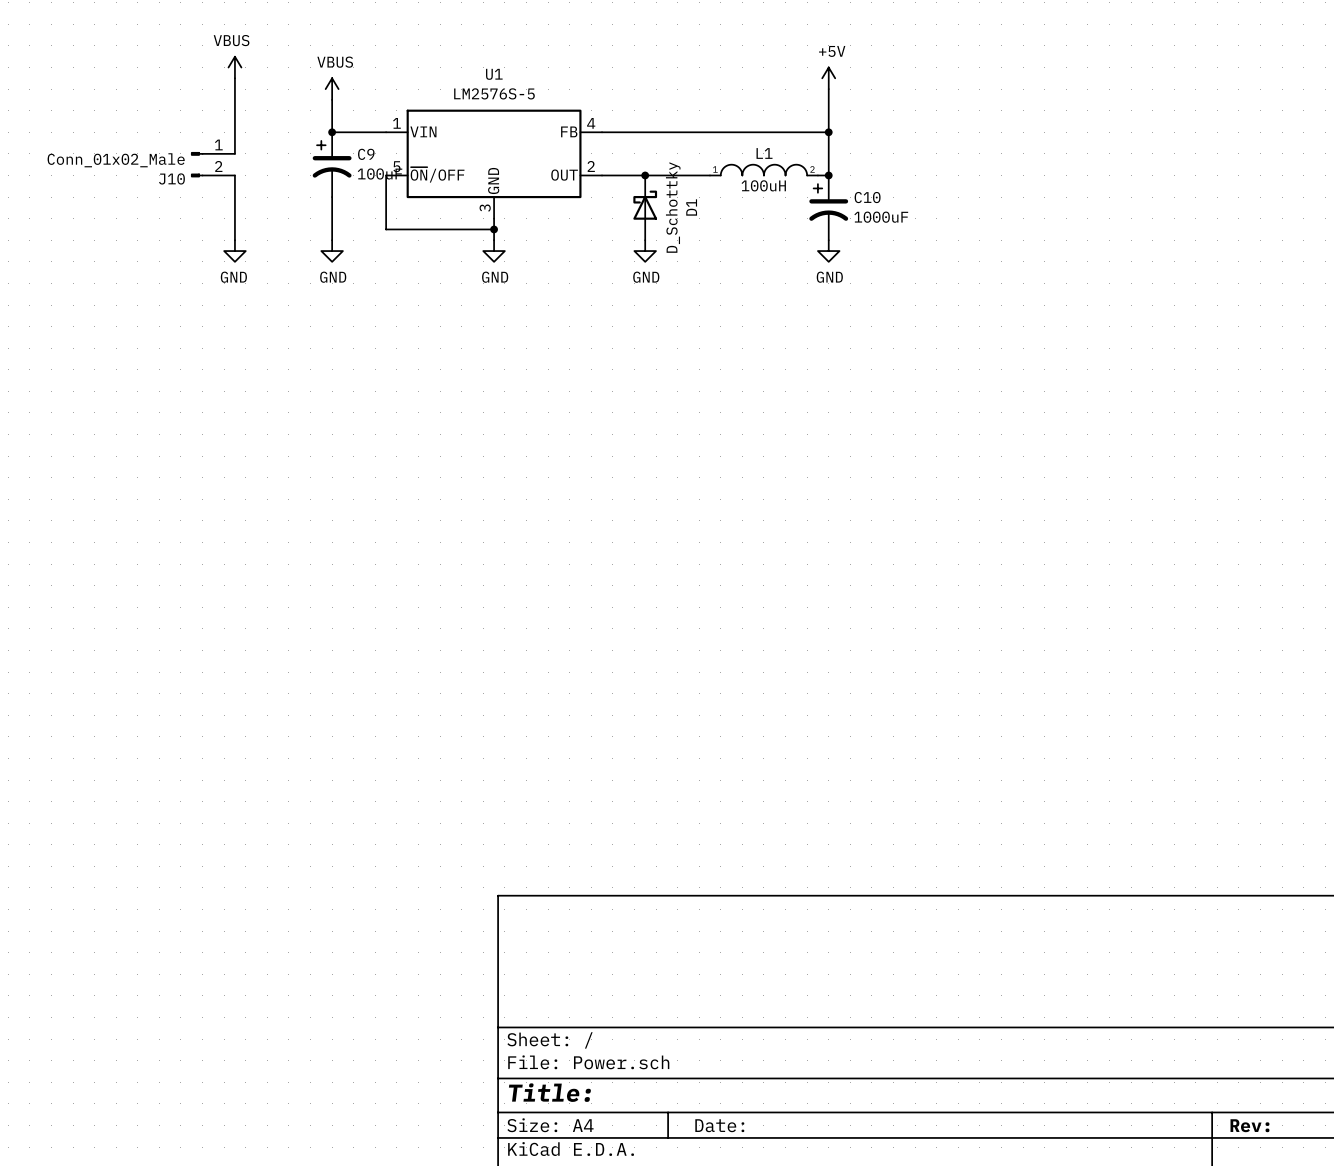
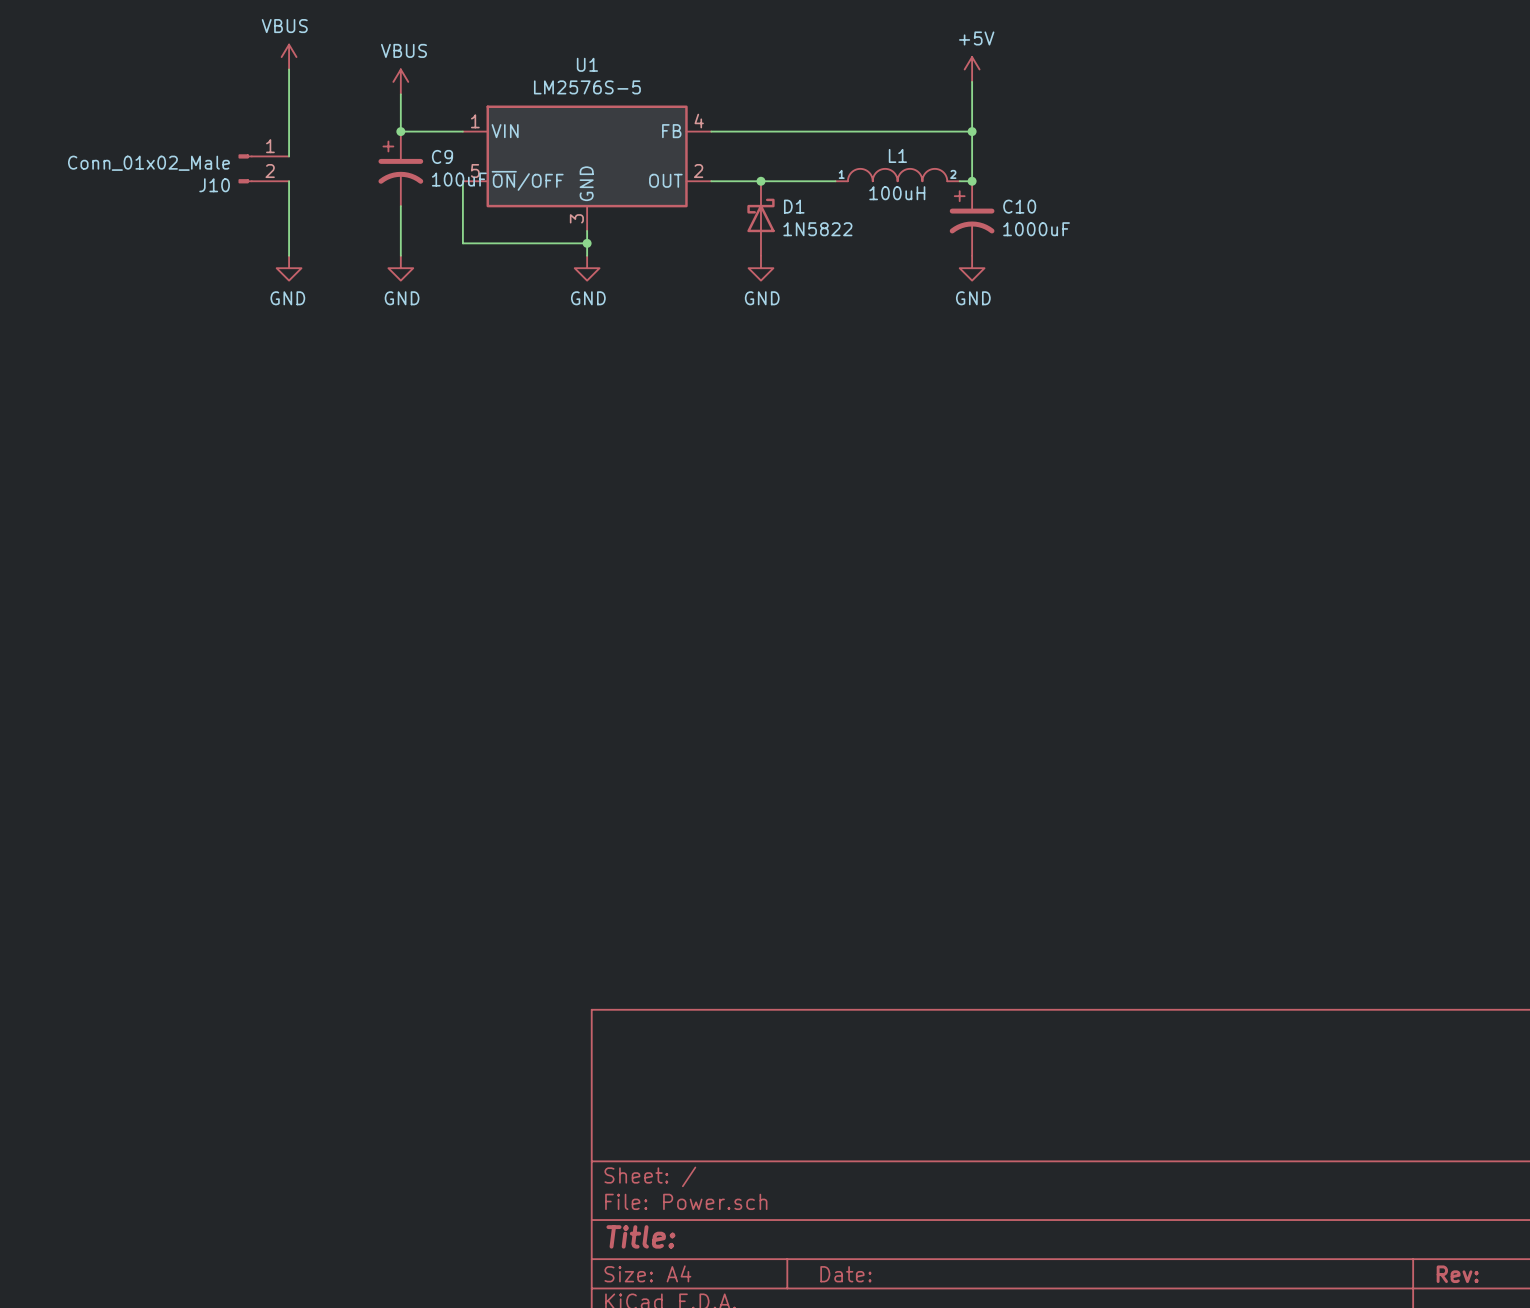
D1 value: D_Schottky (673, 207) -> 1N5822 (817, 229)
D1 name rotation: 0° (691, 207) -> 90° clockwise (794, 206)

